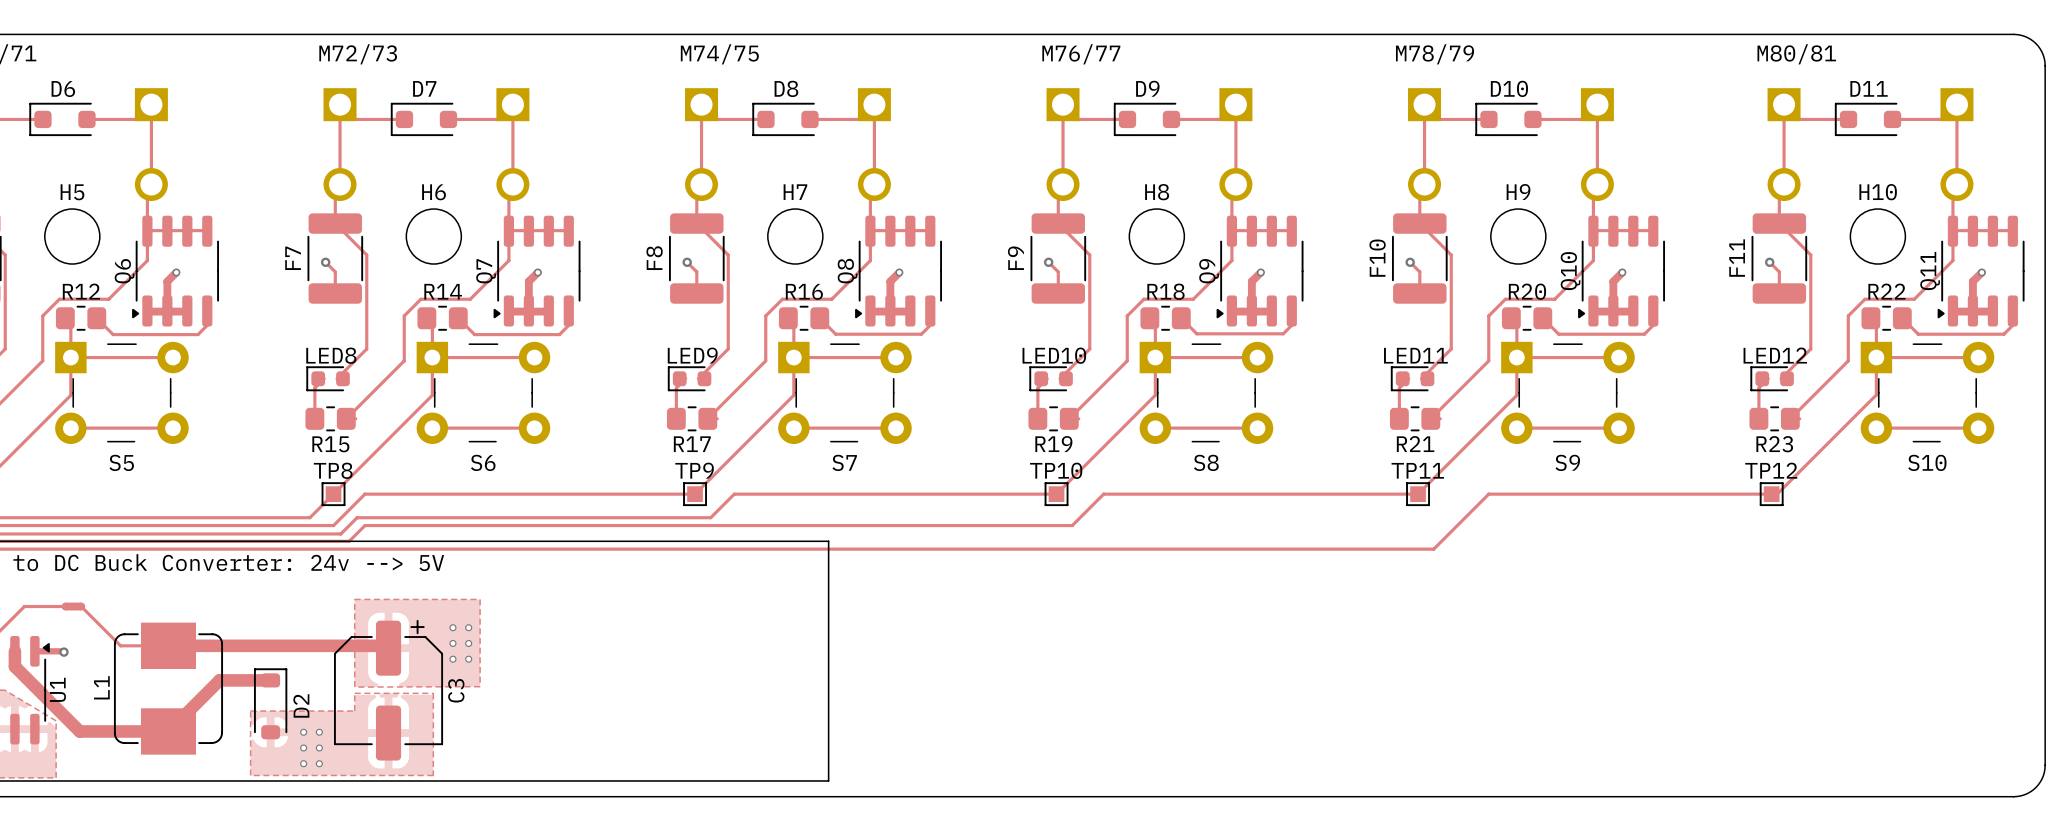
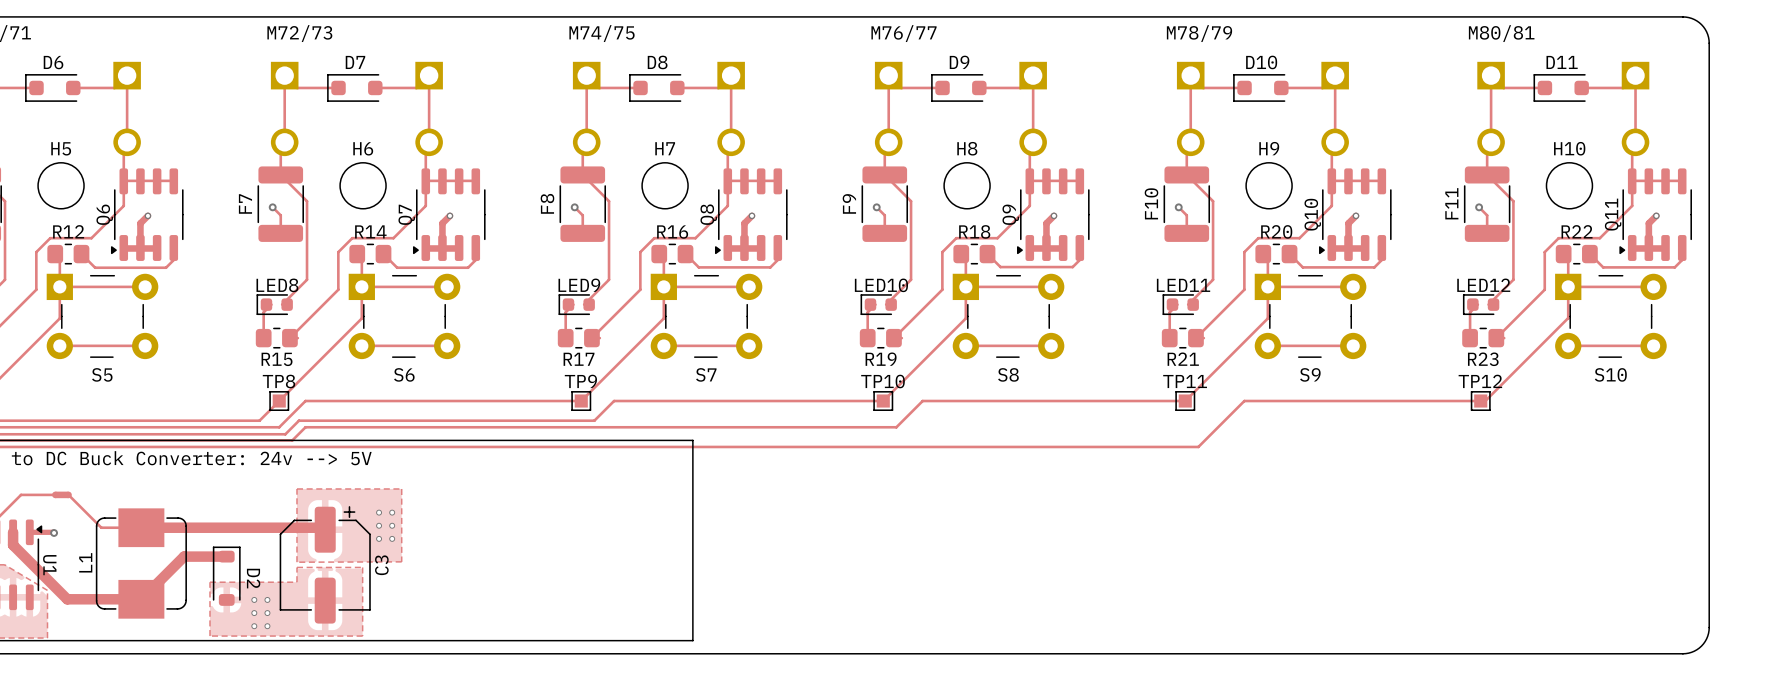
U1 name rotation: 0° (57, 689) -> 180° (49, 565)
D2 name rotation: 0° (301, 705) -> 180° (253, 578)

